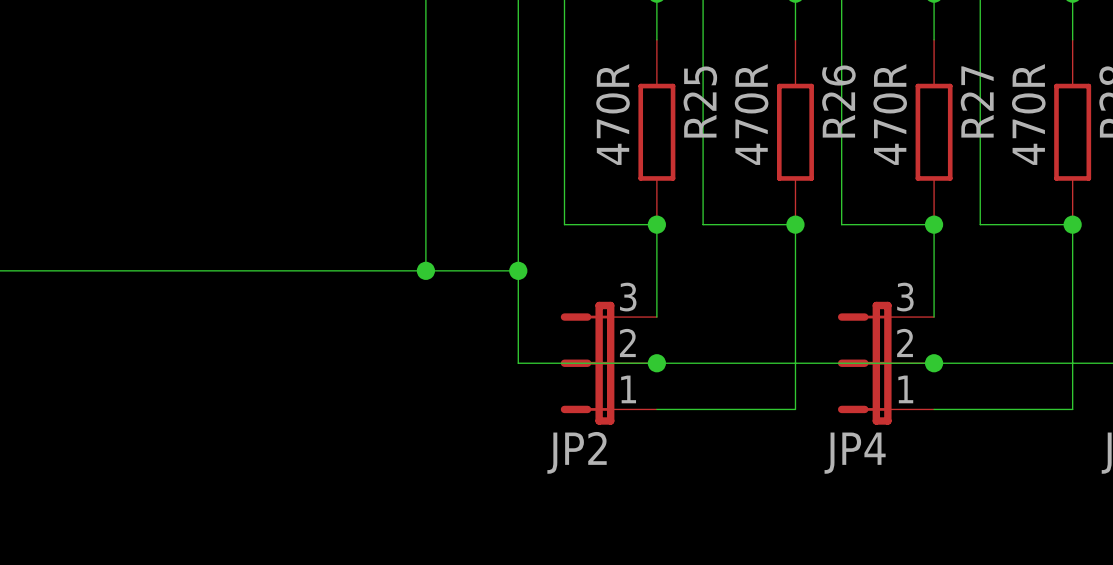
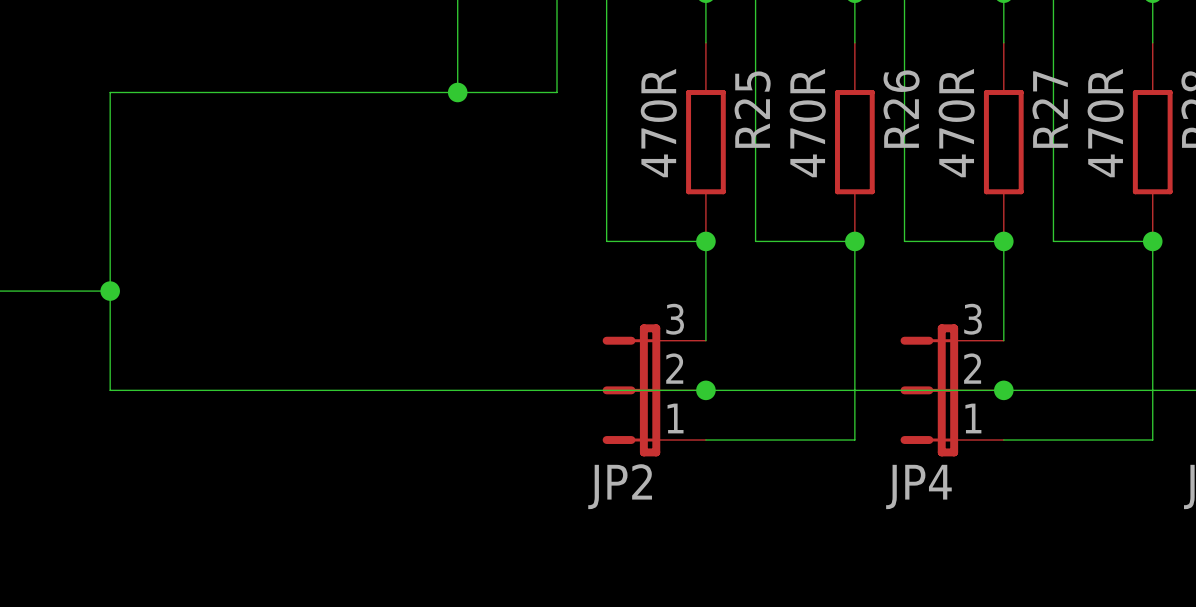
wire: (425, 86) (425, 270) -> none
junction: none -> (457, 92)
wire: (518, 86) (518, 363) -> (556, 92) (110, 92) (110, 390) (556, 390)
wire: (102, 270) (518, 270) -> none
junction: none -> (110, 291)
junction: (425, 270) -> none
junction: (518, 270) -> none

